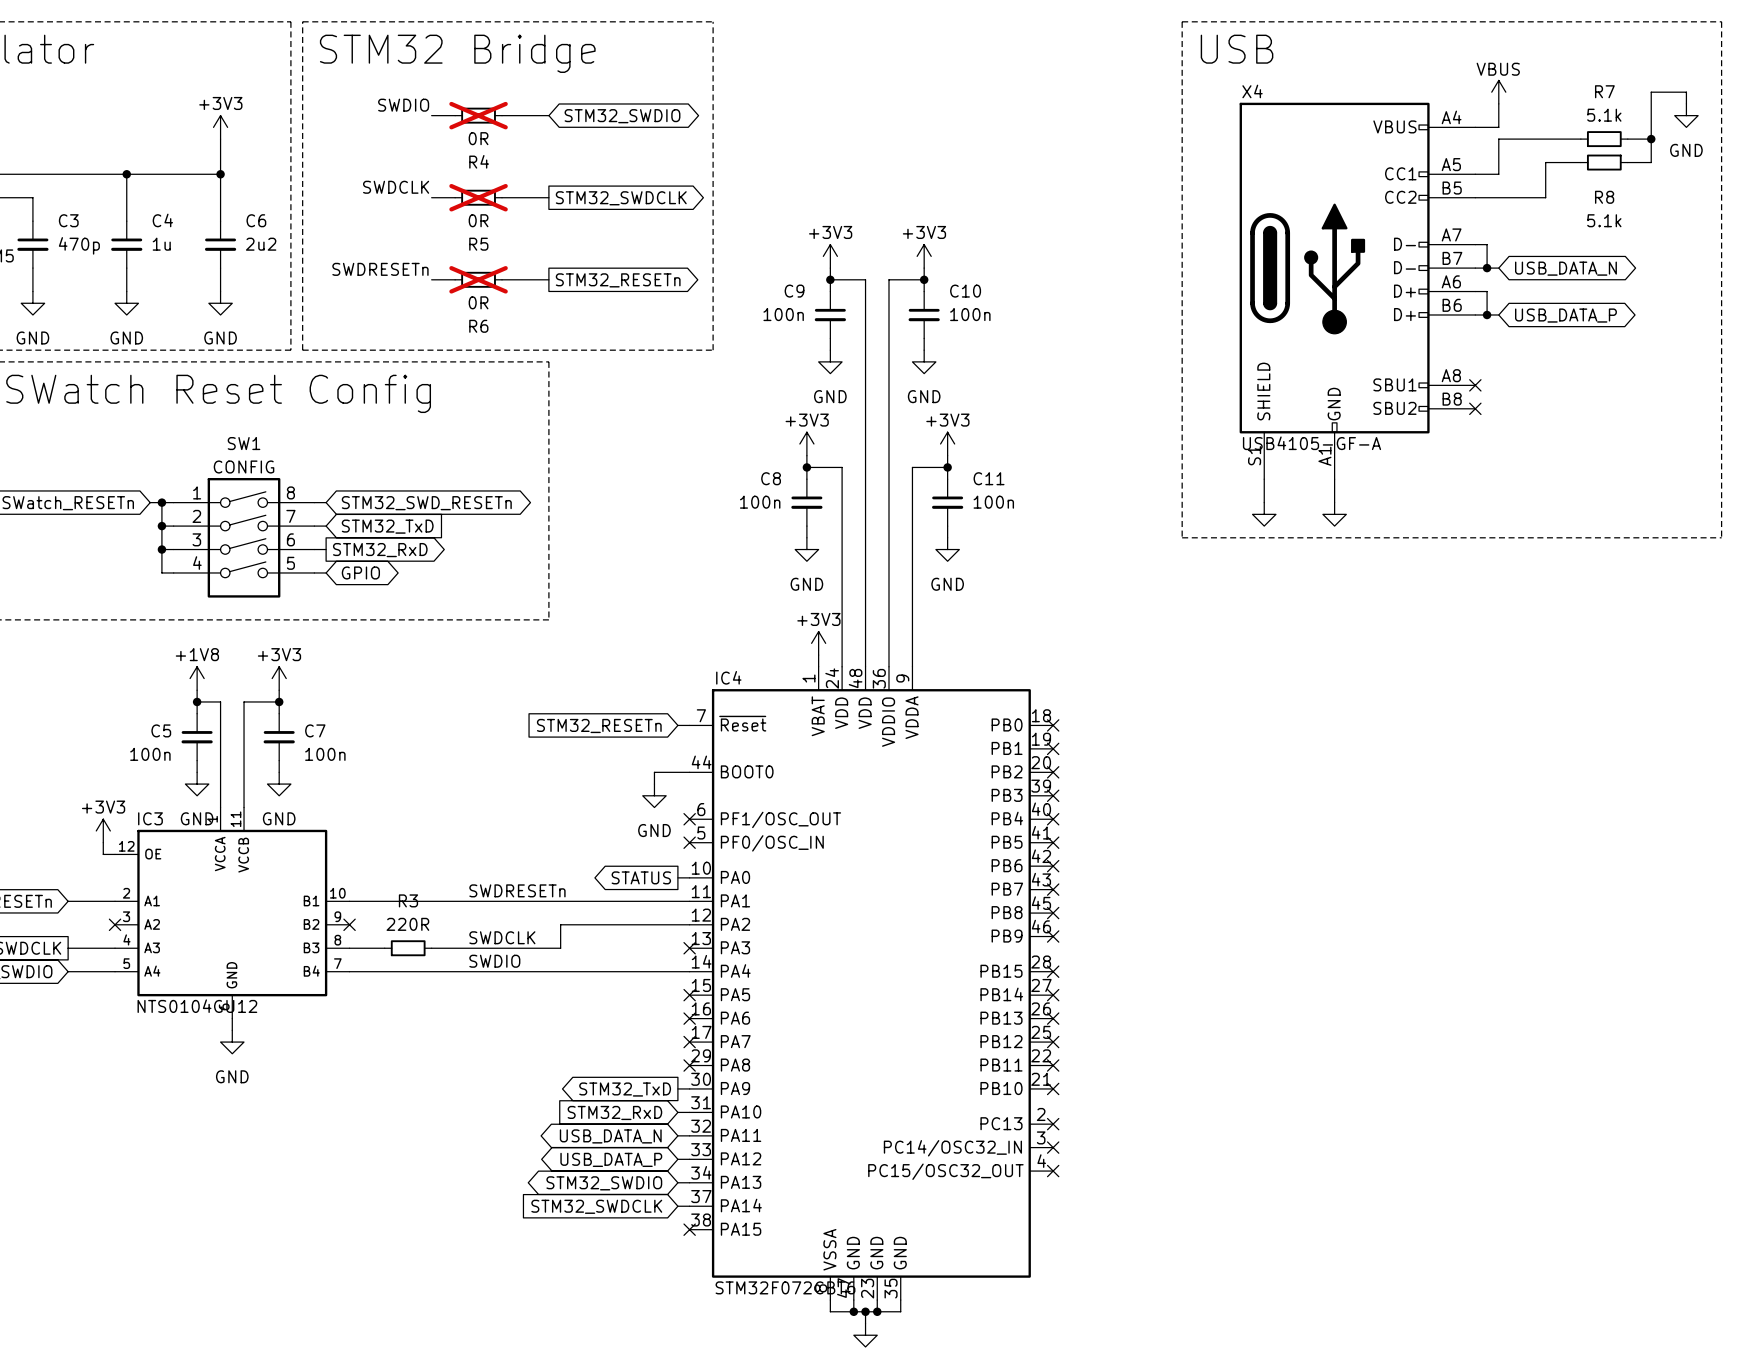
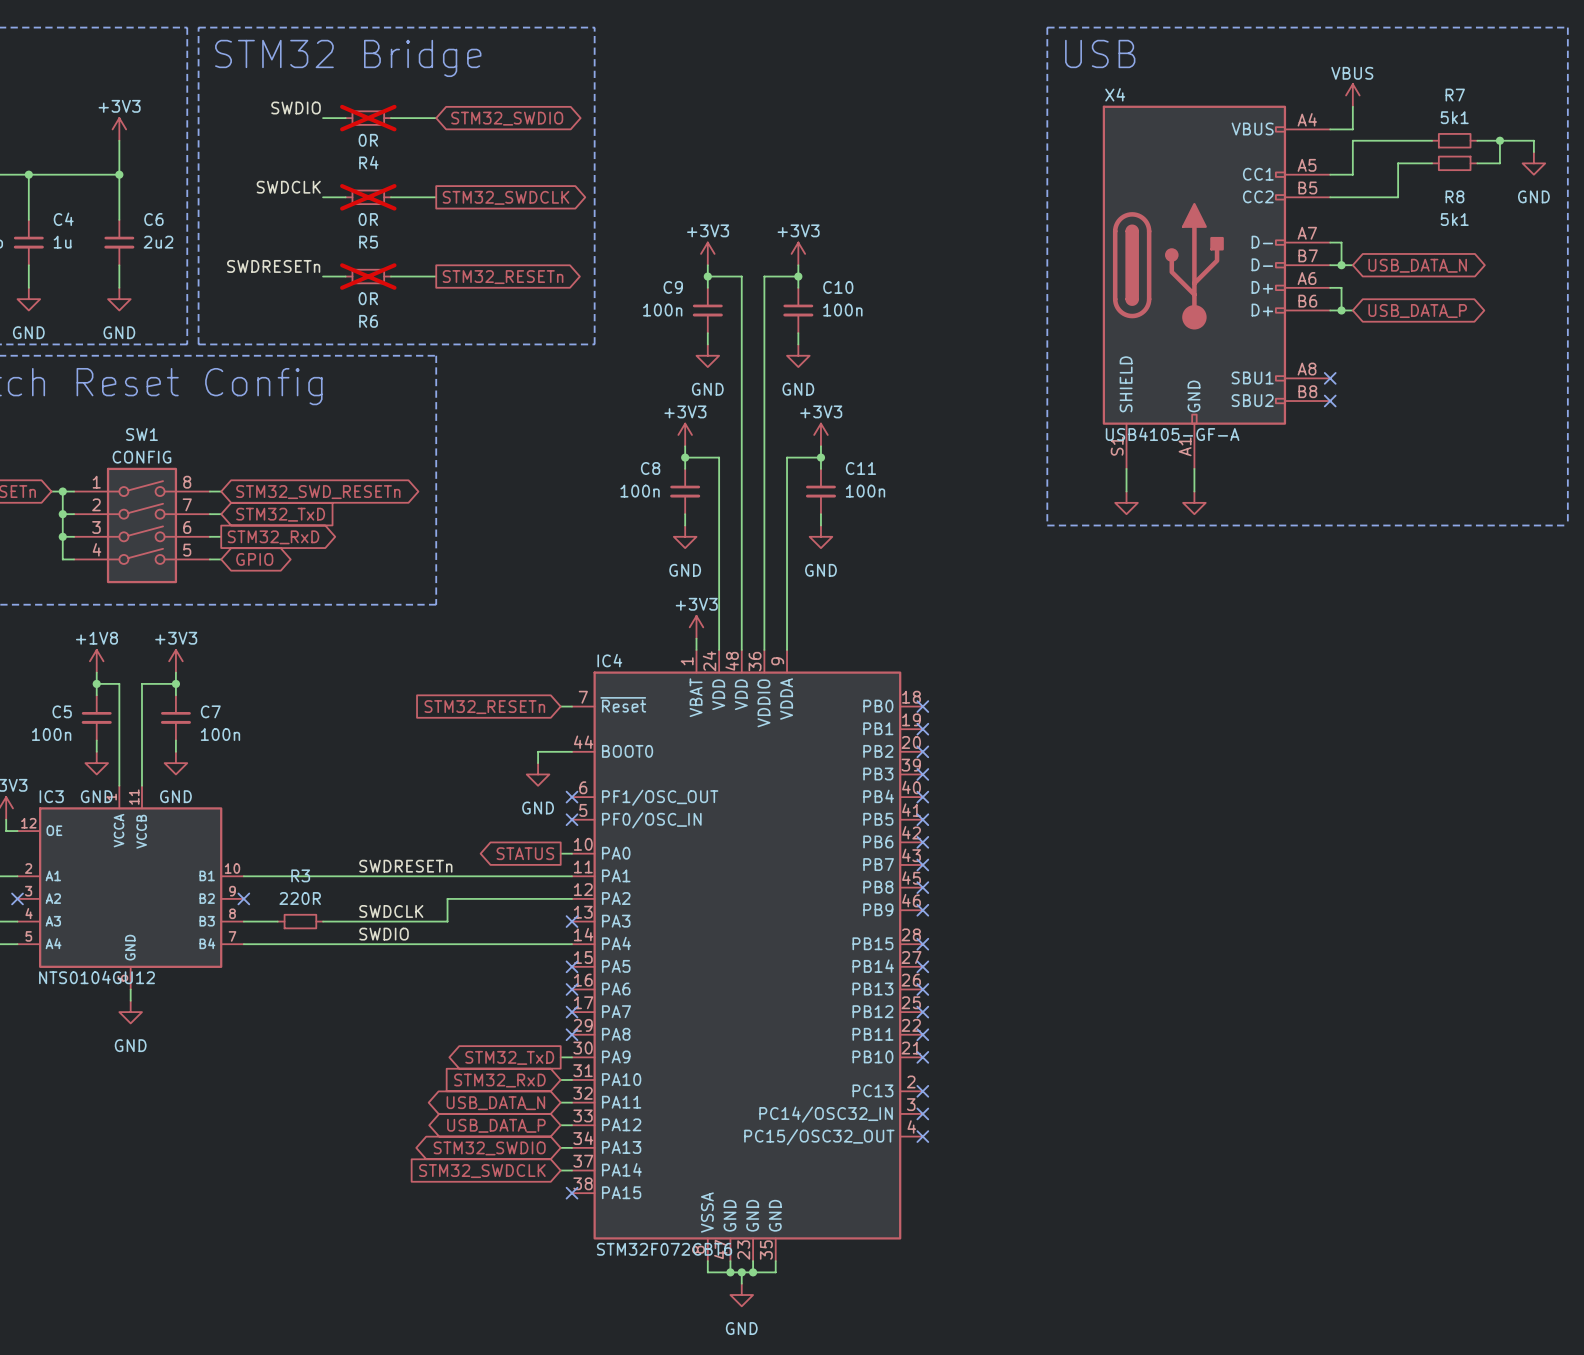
wire: (1686, 103) (1686, 92) (1651, 92) (1651, 139) -> (1533, 152) (1533, 140) (1499, 140)
R7 value: 5.1k (1604, 115) -> 5k1 (1454, 117)
power symbol position: GND (1686, 115) -> GND (1533, 163)
R8 value: 5.1k (1604, 220) -> 5k1 (1454, 219)

